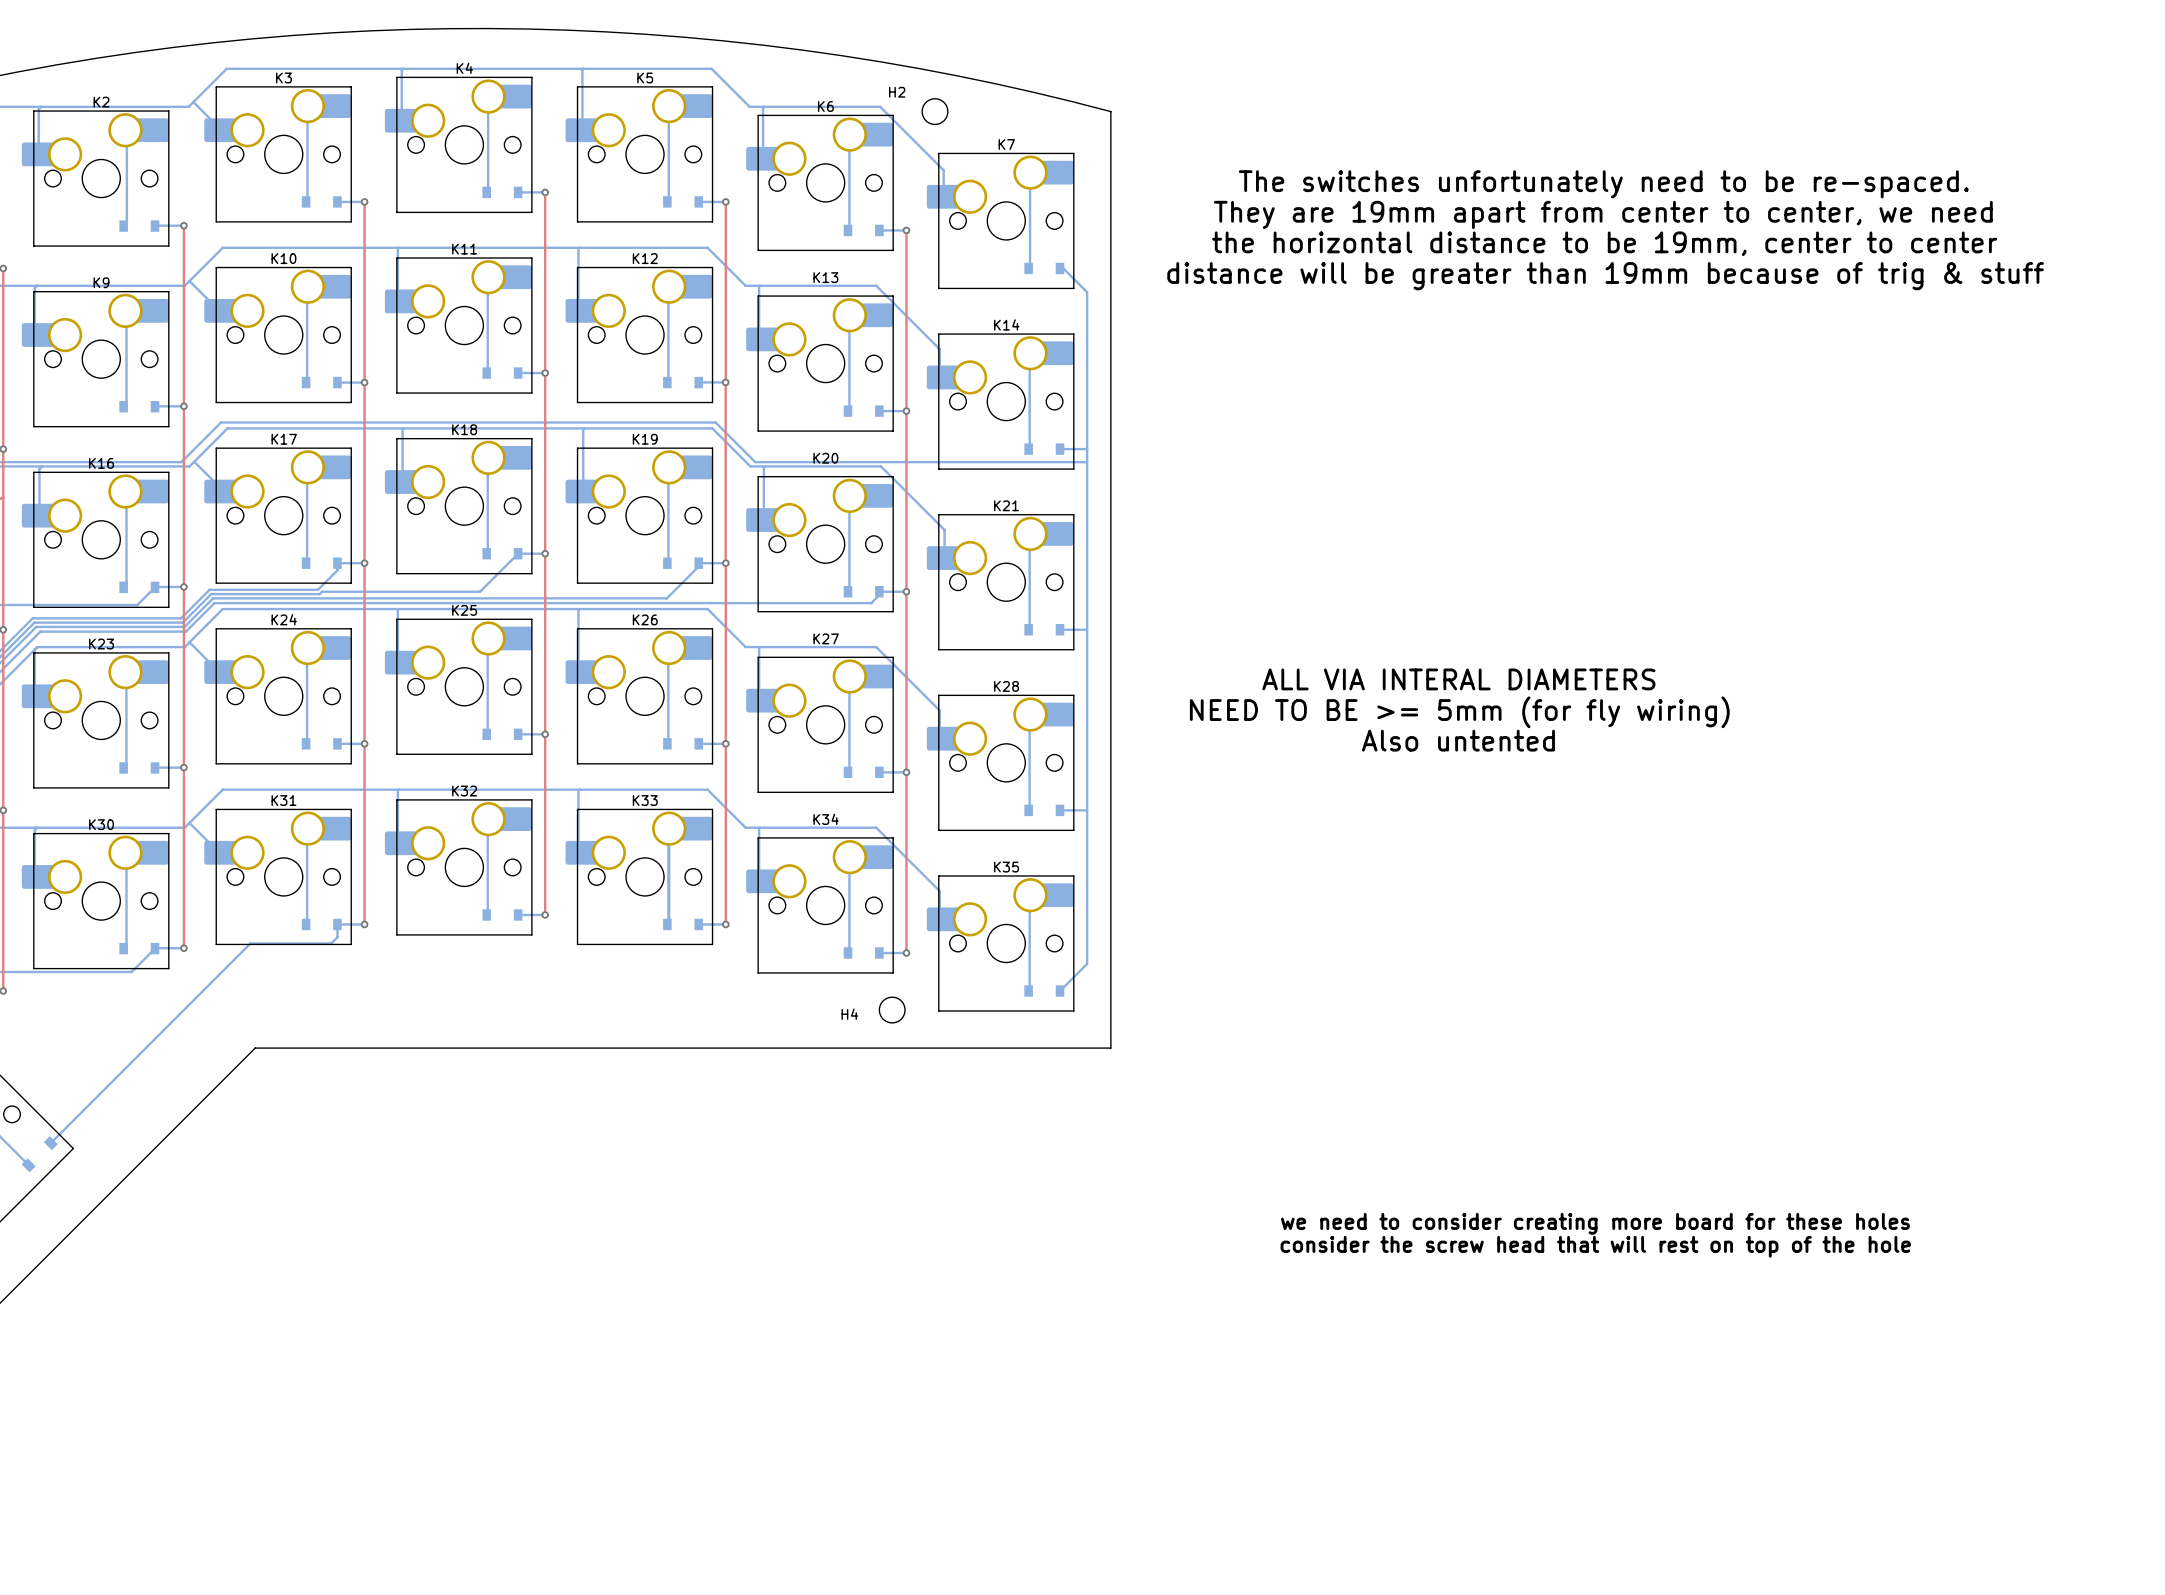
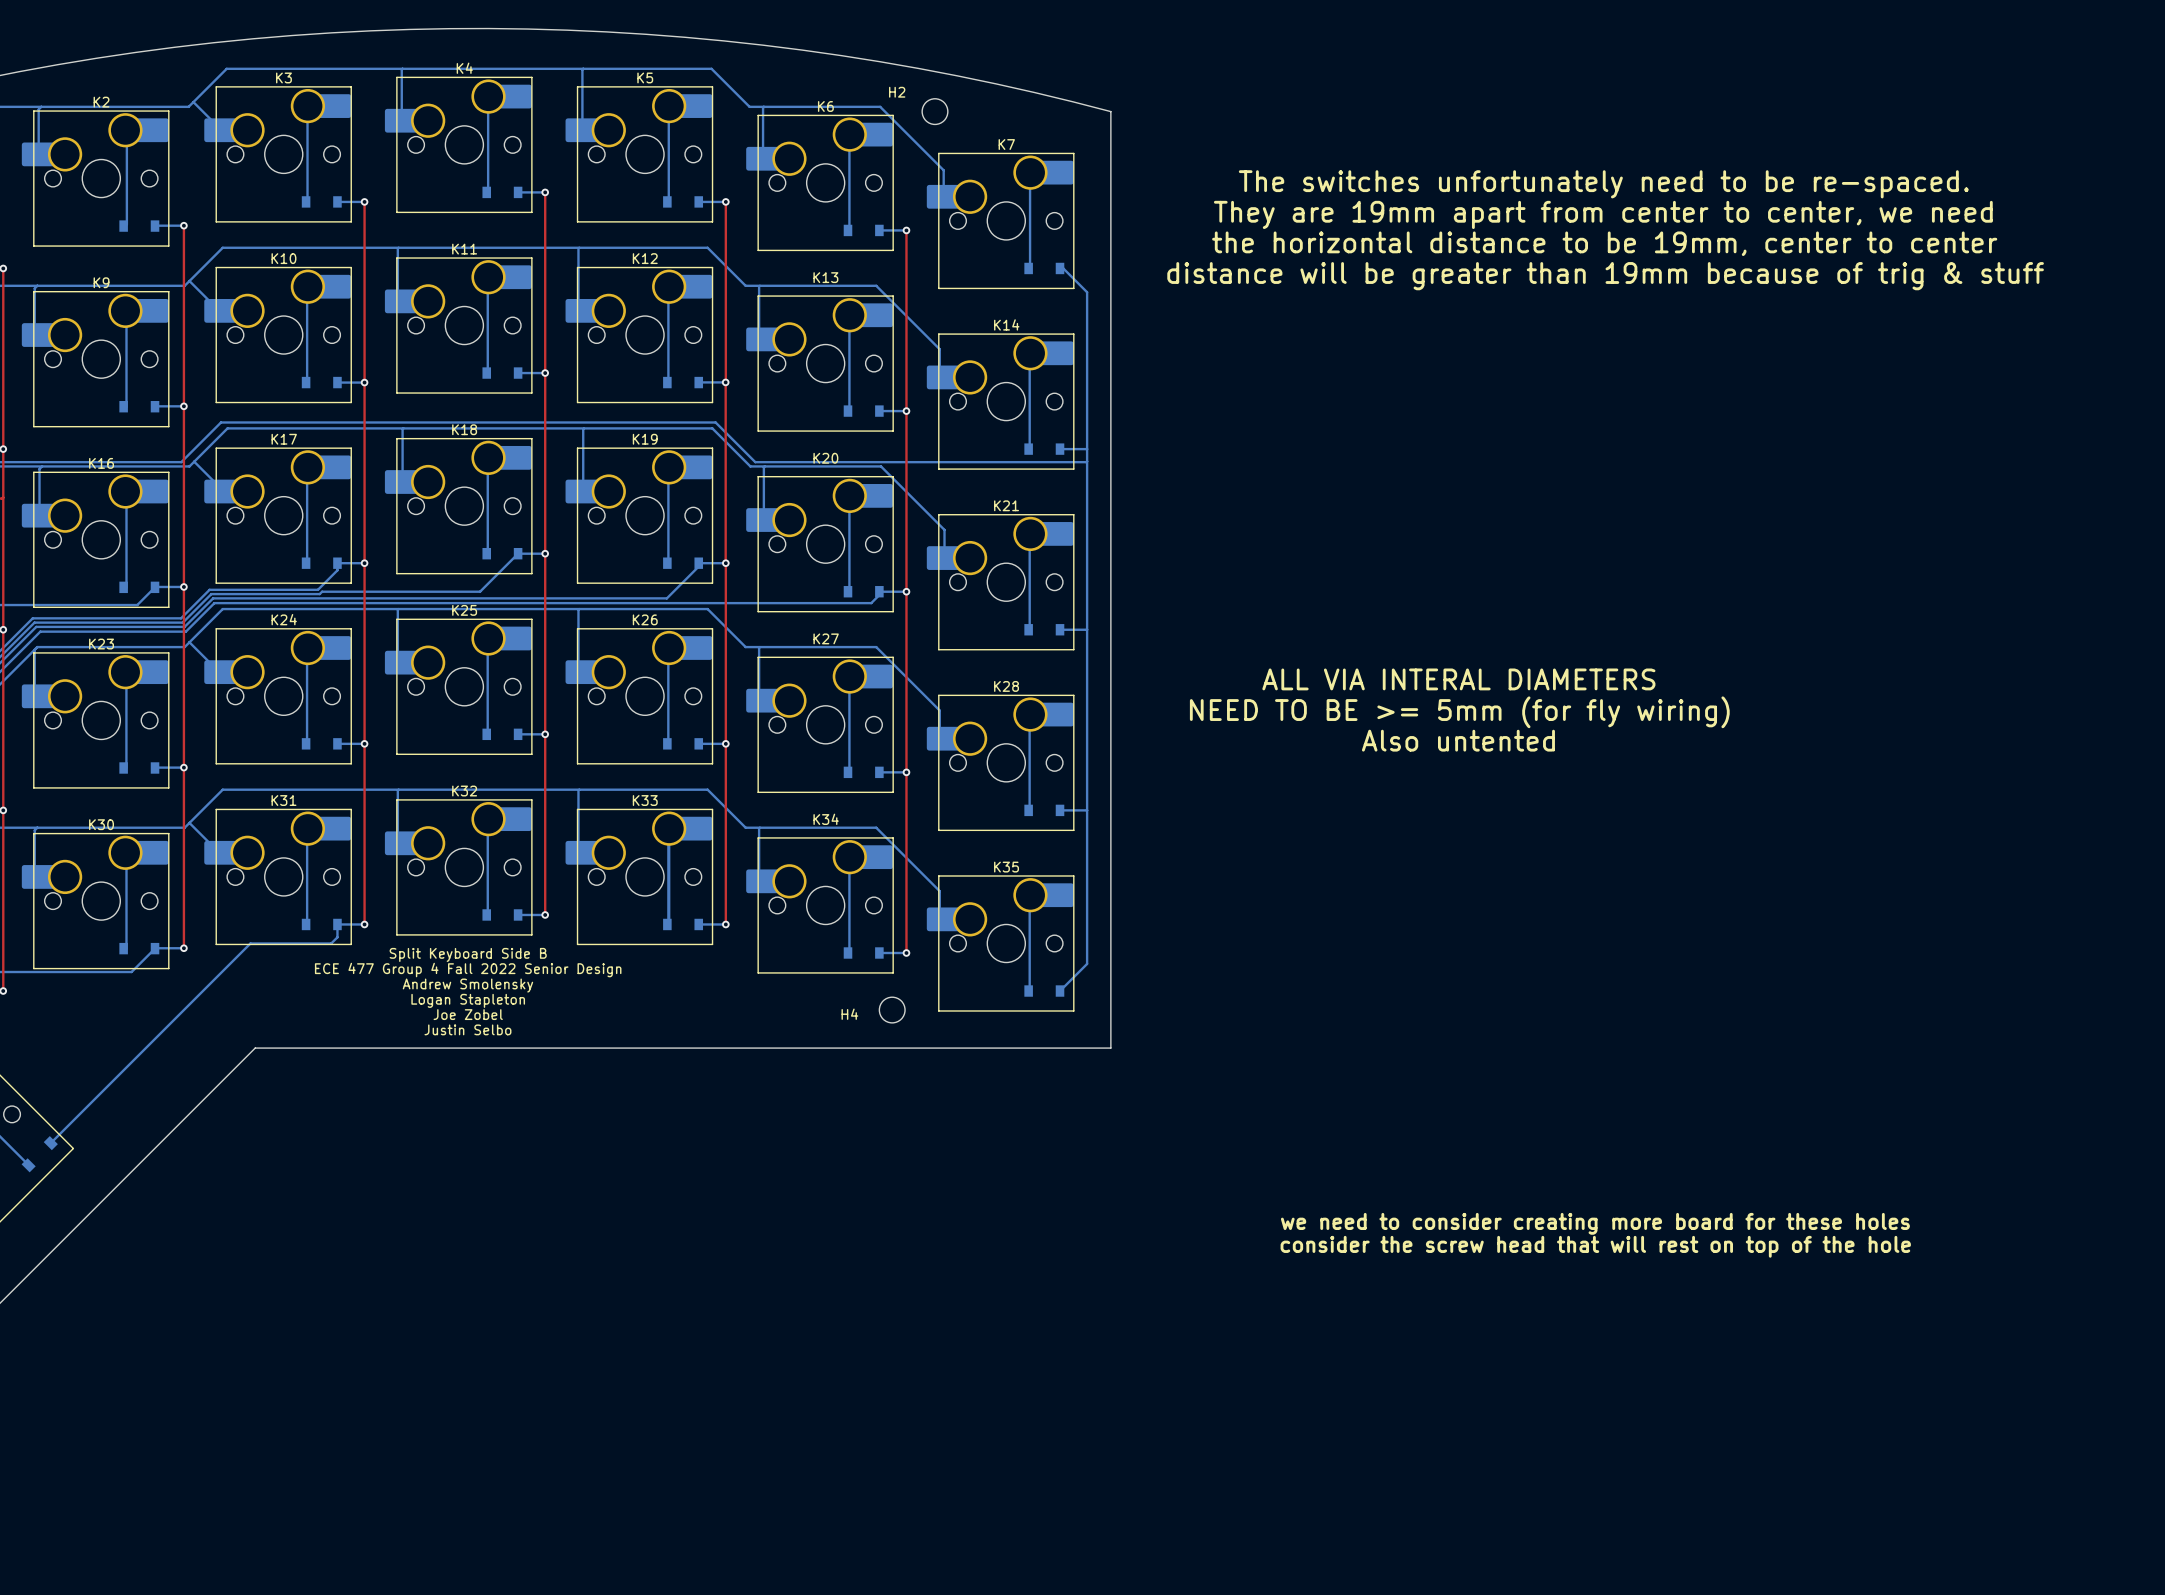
text: none -> Split Keyboard Side B (468, 954)
text: none -> ECE 477 Group 4 Fall 2022 Senior Design (468, 970)
text: none -> Andrew Smolensky (467, 985)
text: none -> Logan Stapleton (468, 1000)
text: none -> Joe Zobel (468, 1014)
text: none -> Justin Selbo (467, 1029)

